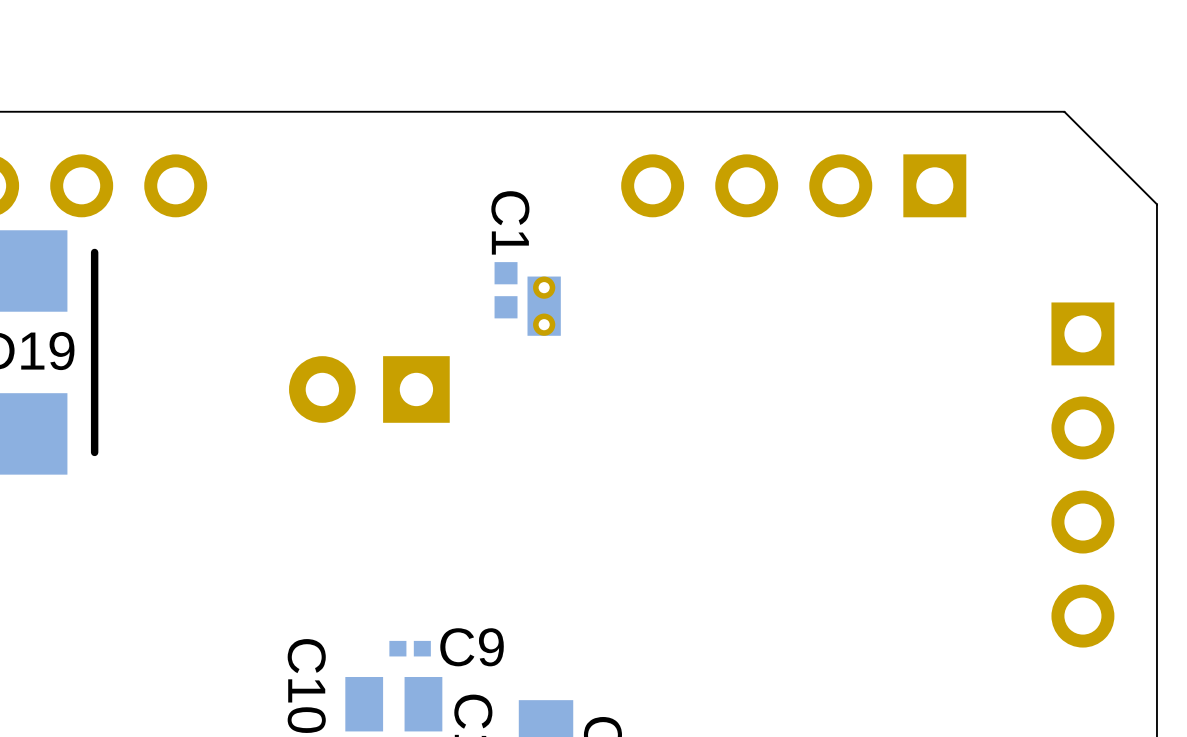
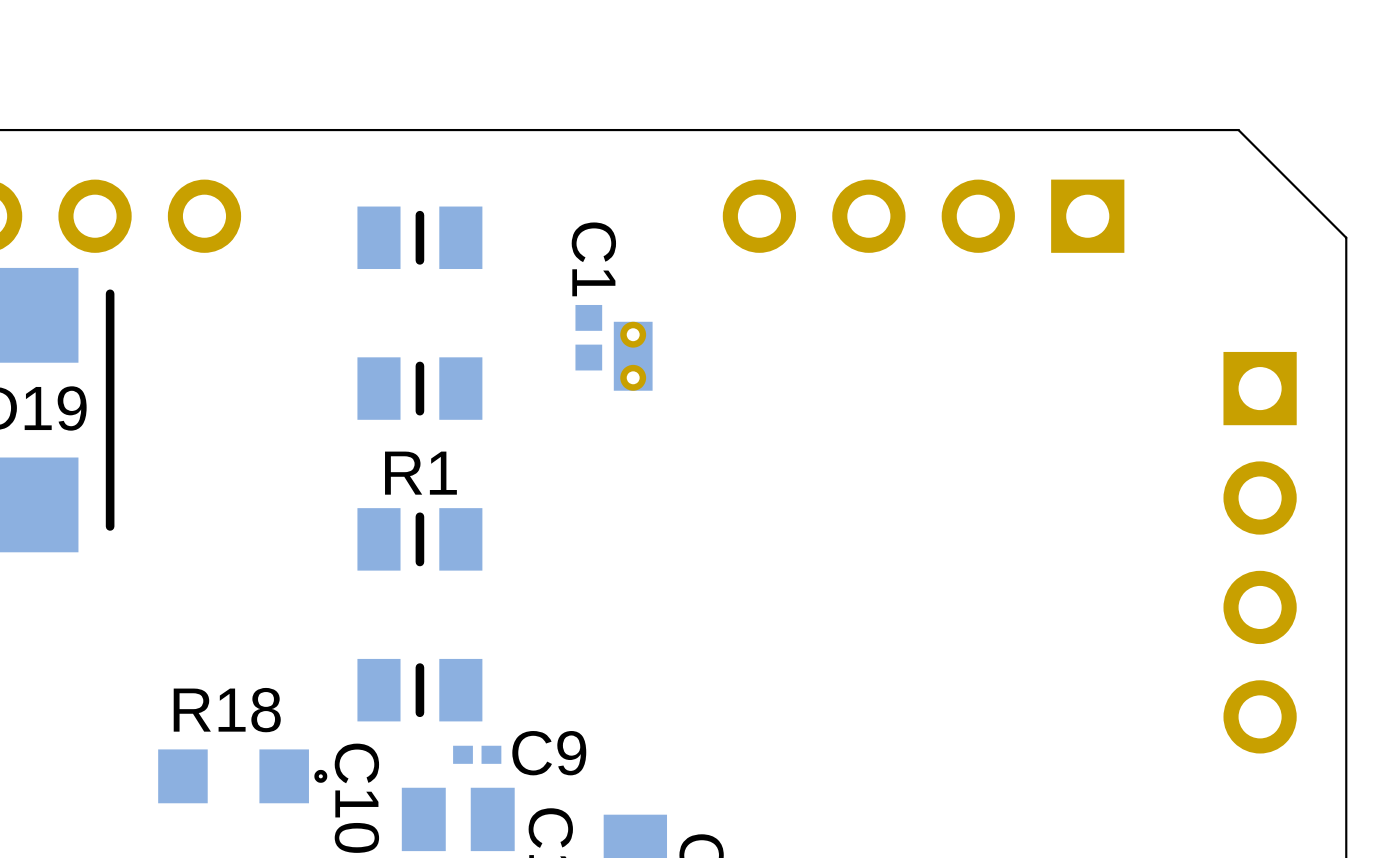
R1: none -> (419, 237)
part: none -> (419, 388)
part: (369, 389) -> none
part: none -> (419, 539)
part: none -> (419, 690)
R18: none -> (242, 776)

